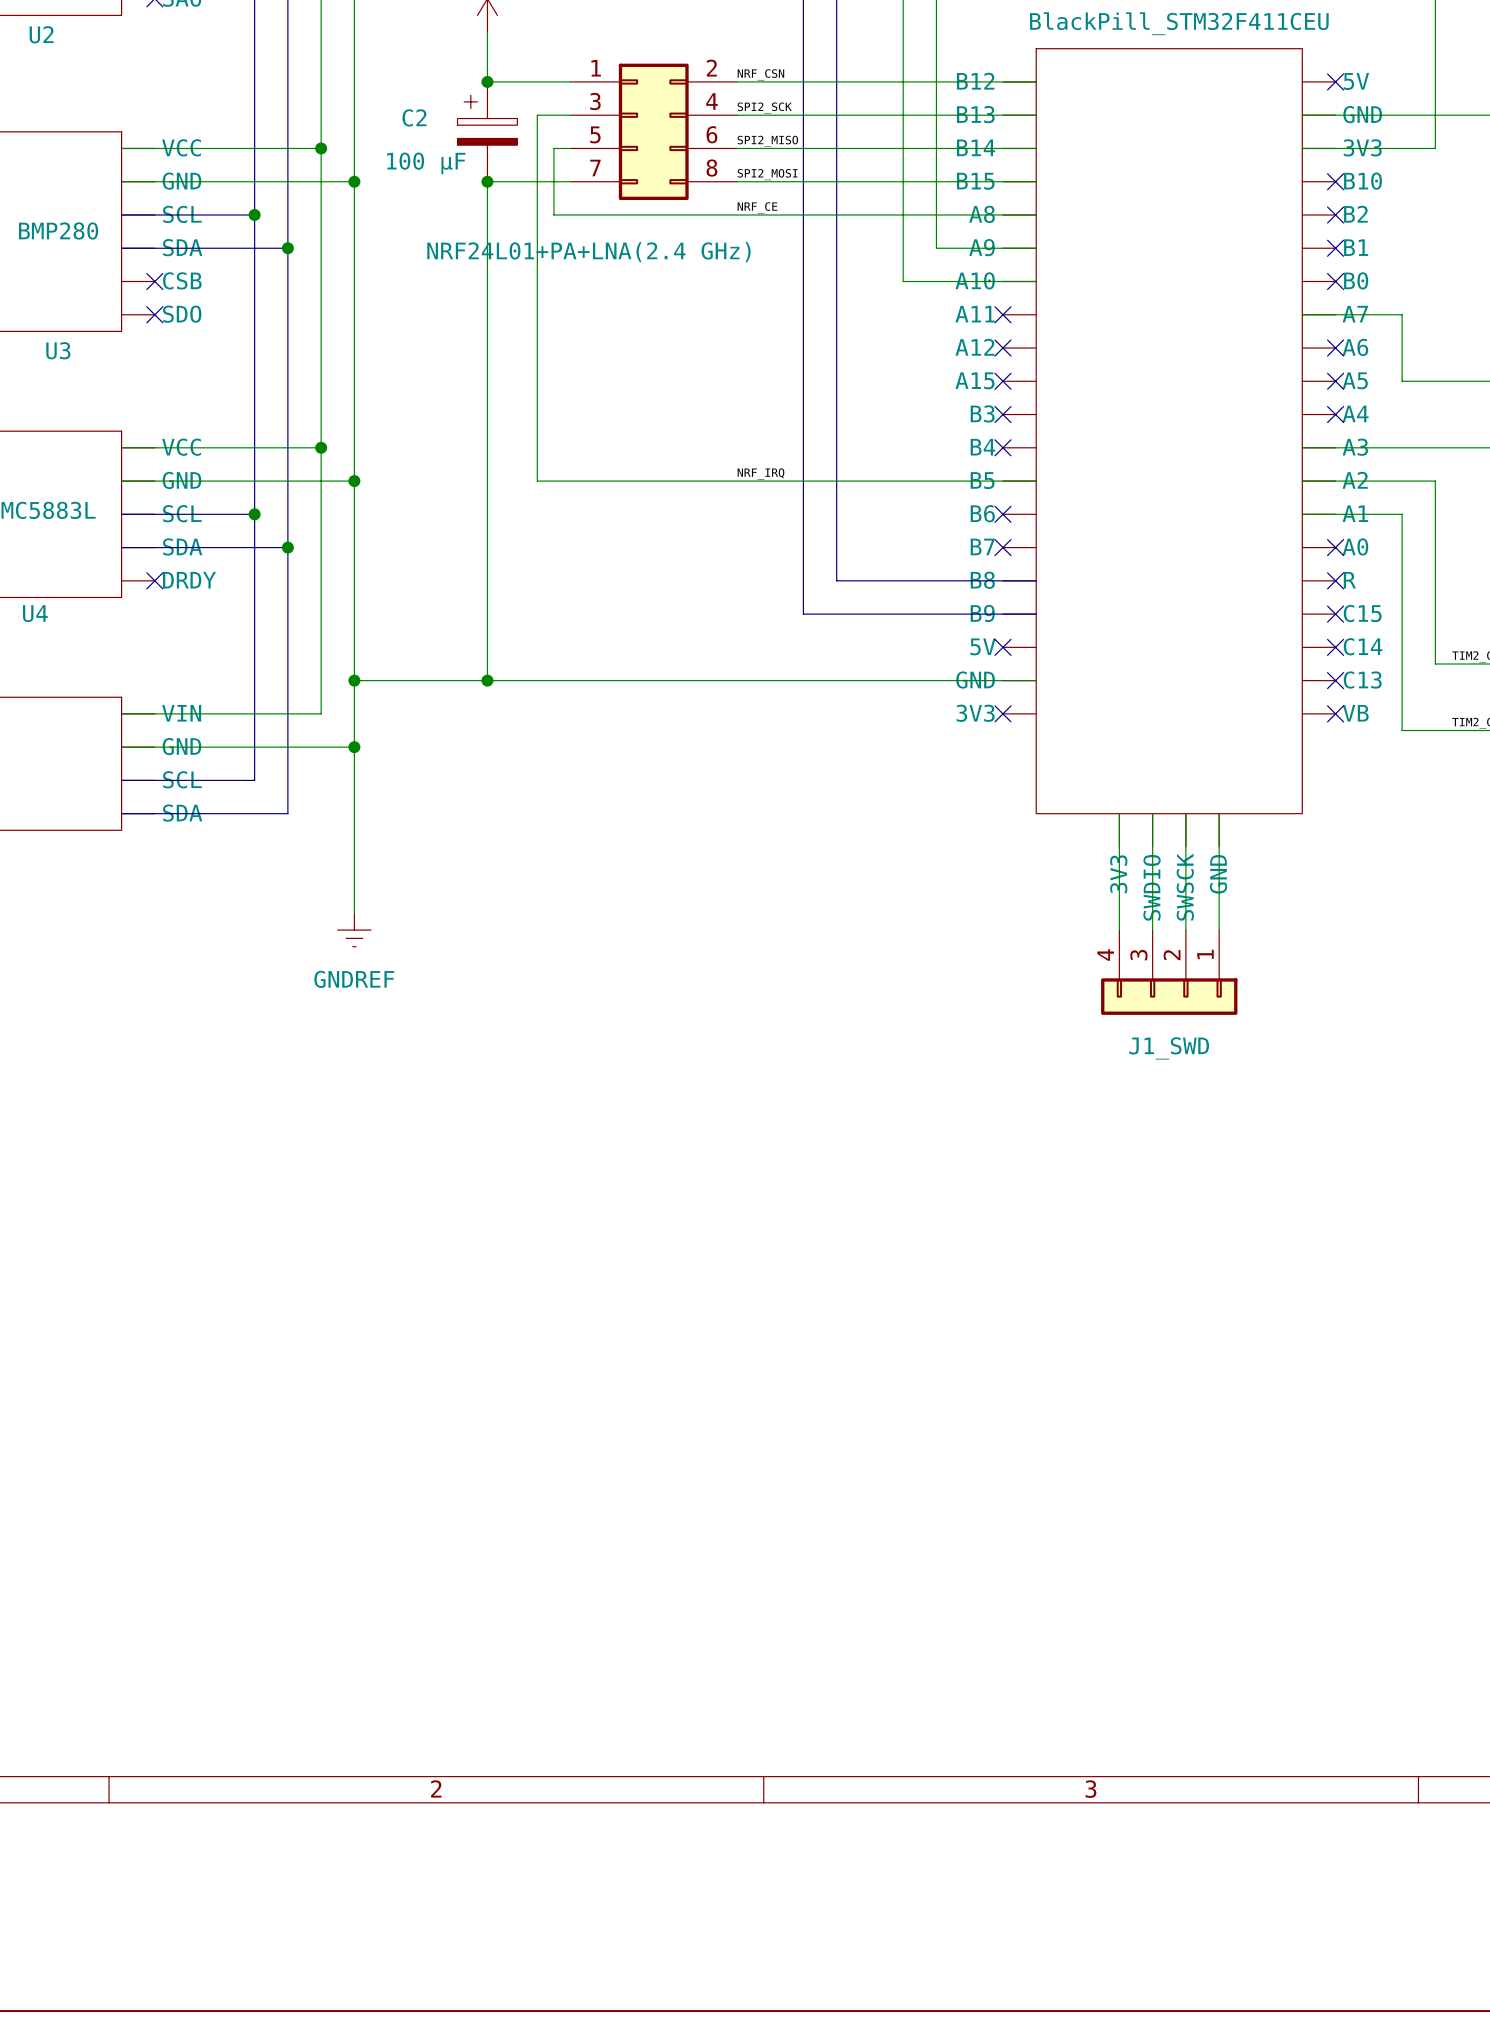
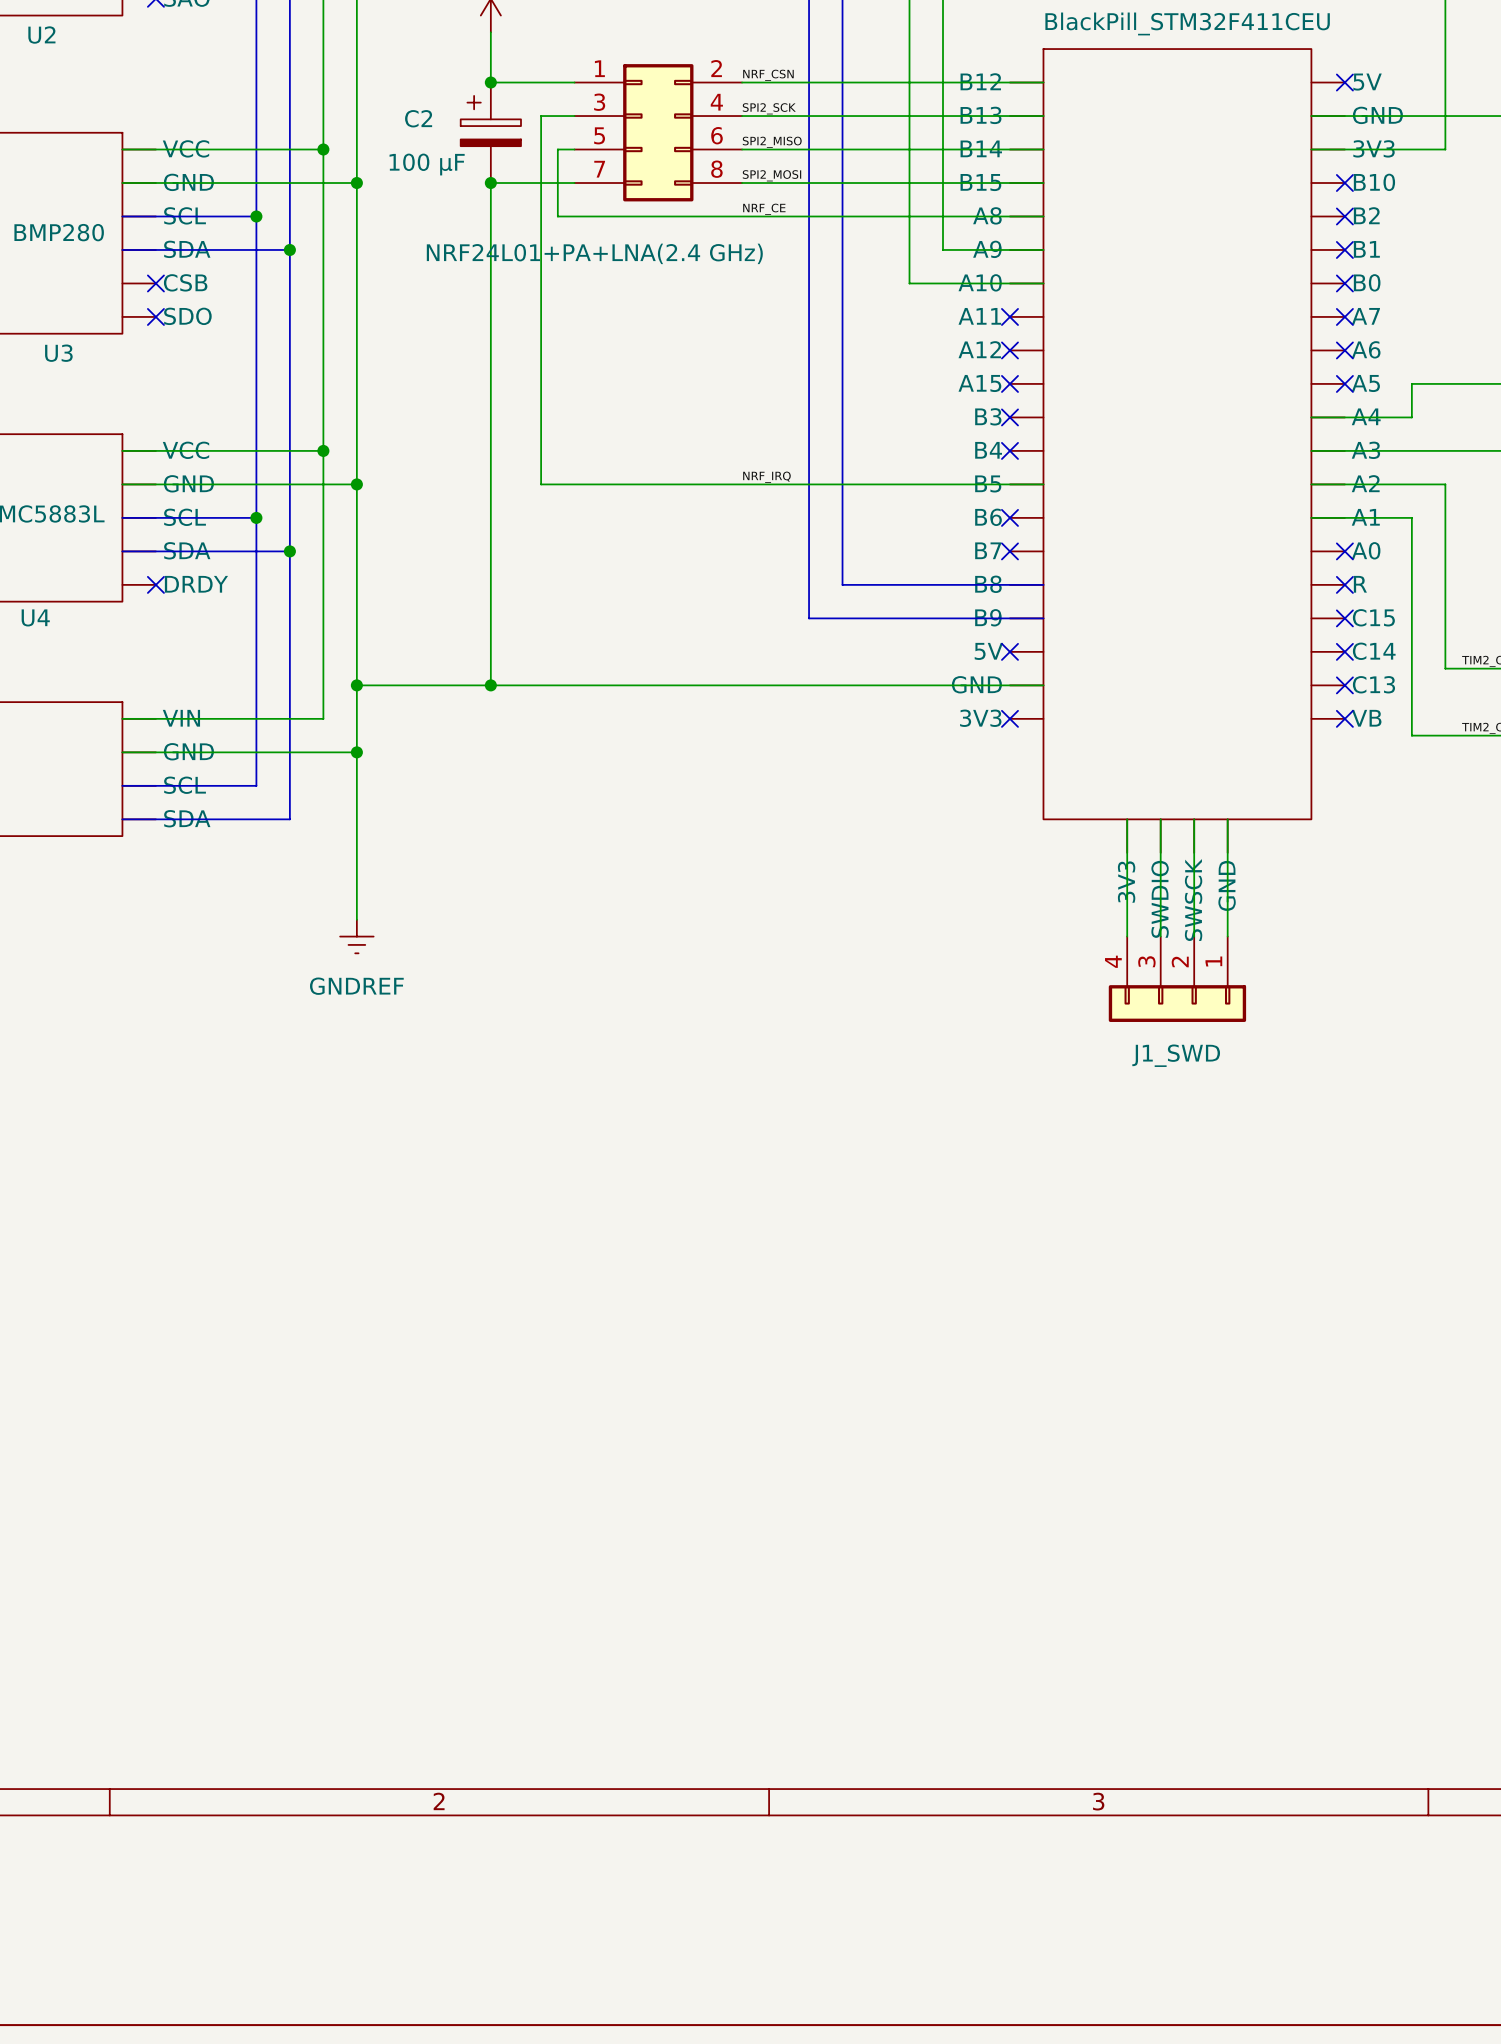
wire: (1302, 314) (1402, 314) (1402, 381) -> (1311, 417) (1411, 417) (1411, 383)
no-connect mark: none -> (1344, 316)
no-connect mark: (1335, 414) -> none

